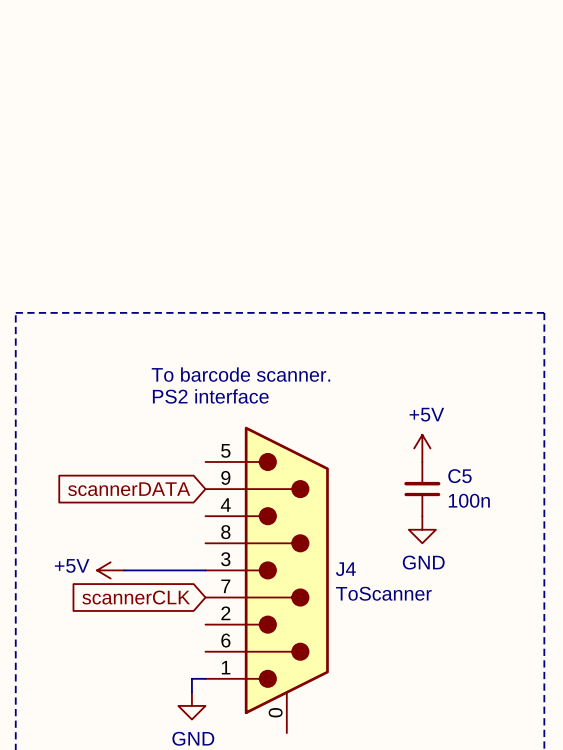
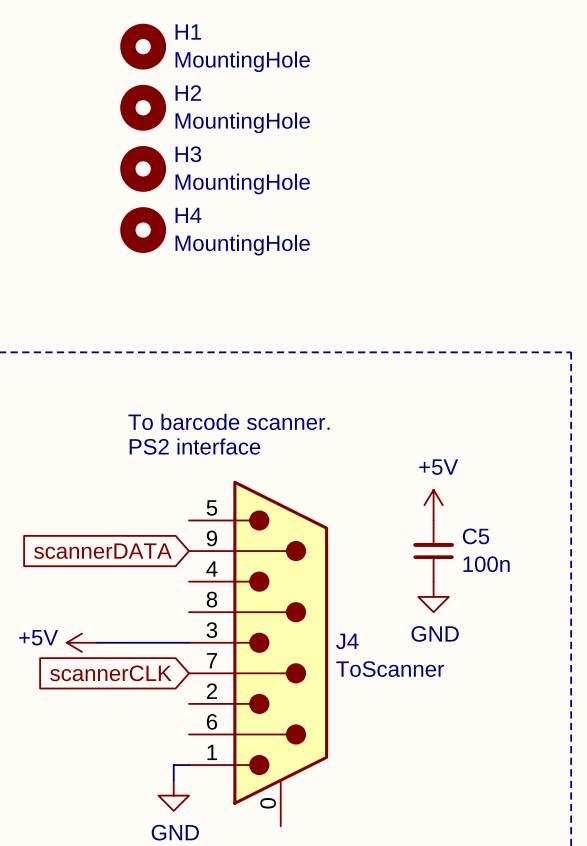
H1: none -> MountingHole (143, 46)
H2: none -> MountingHole (143, 107)
H3: none -> MountingHole (143, 168)
H4: none -> MountingHole (143, 230)

